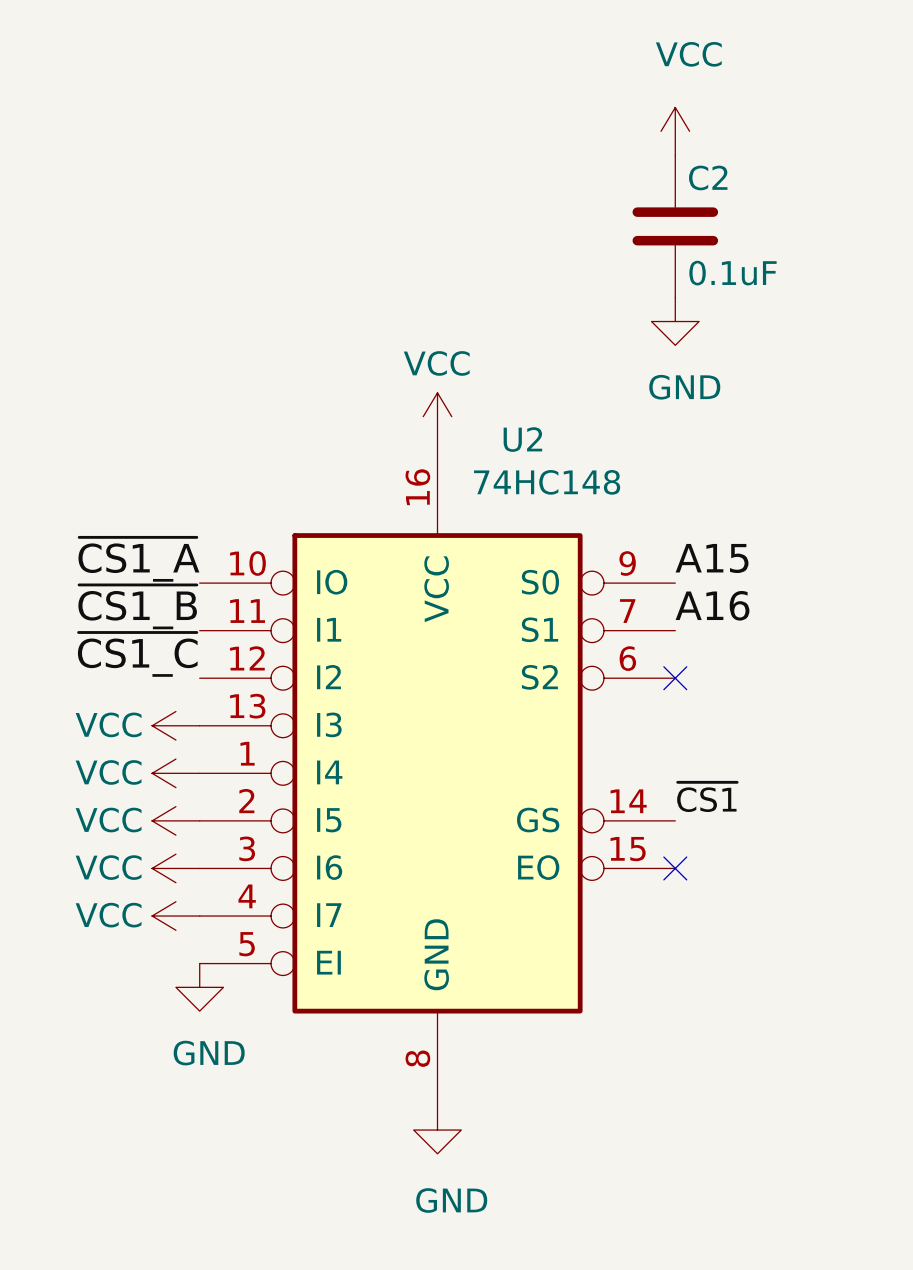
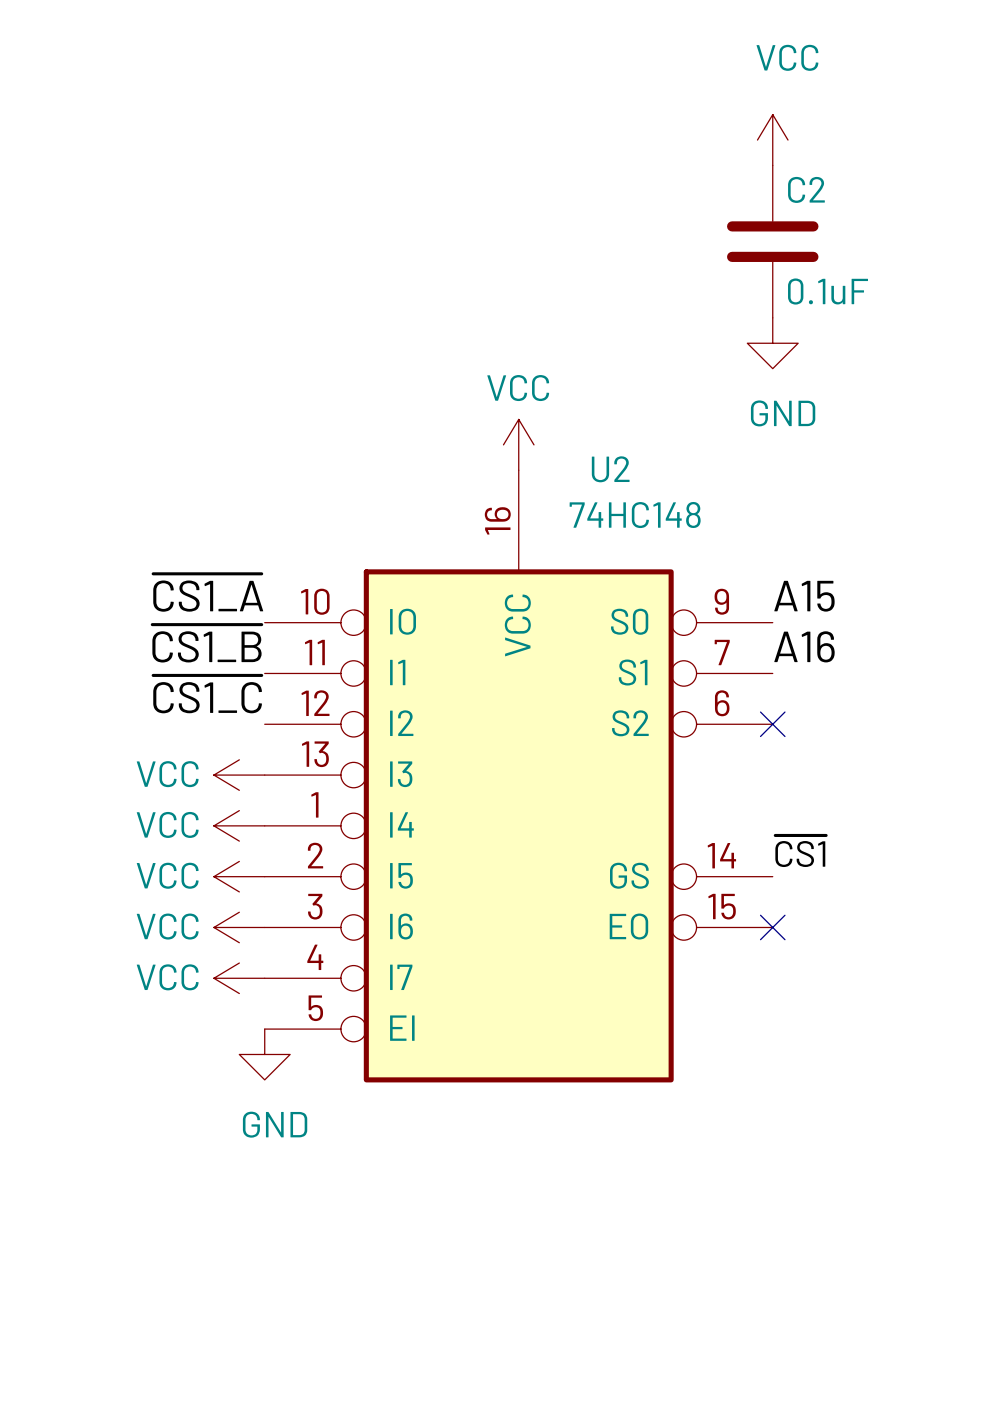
U2 symbol: [199, 440, 676, 1107] -> [264, 470, 773, 1083]
power symbol: GND (437, 1130) -> none

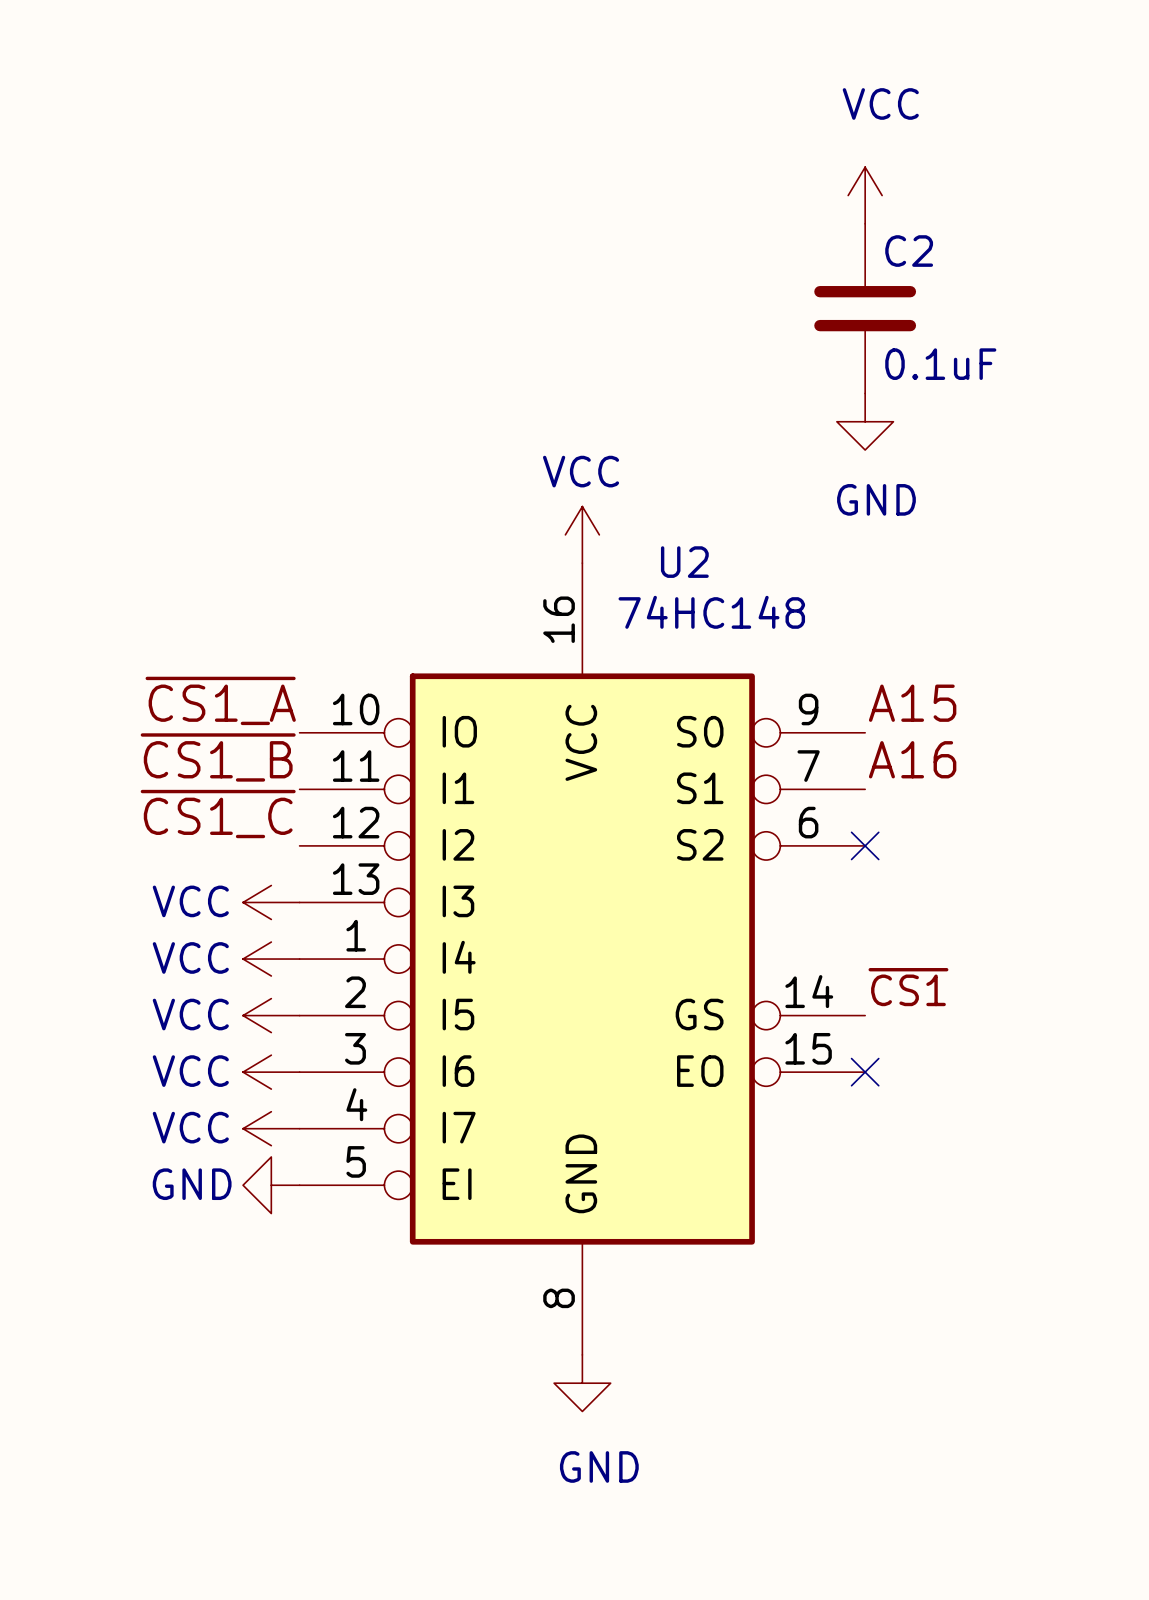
U2 symbol: [264, 470, 773, 1083] -> [299, 563, 866, 1355]
power symbol rotation: 0° (264, 1054) -> 90° clockwise (271, 1185)
power symbol position: GND (264, 1054) -> GND (271, 1185)
power symbol: none -> GND (582, 1383)

